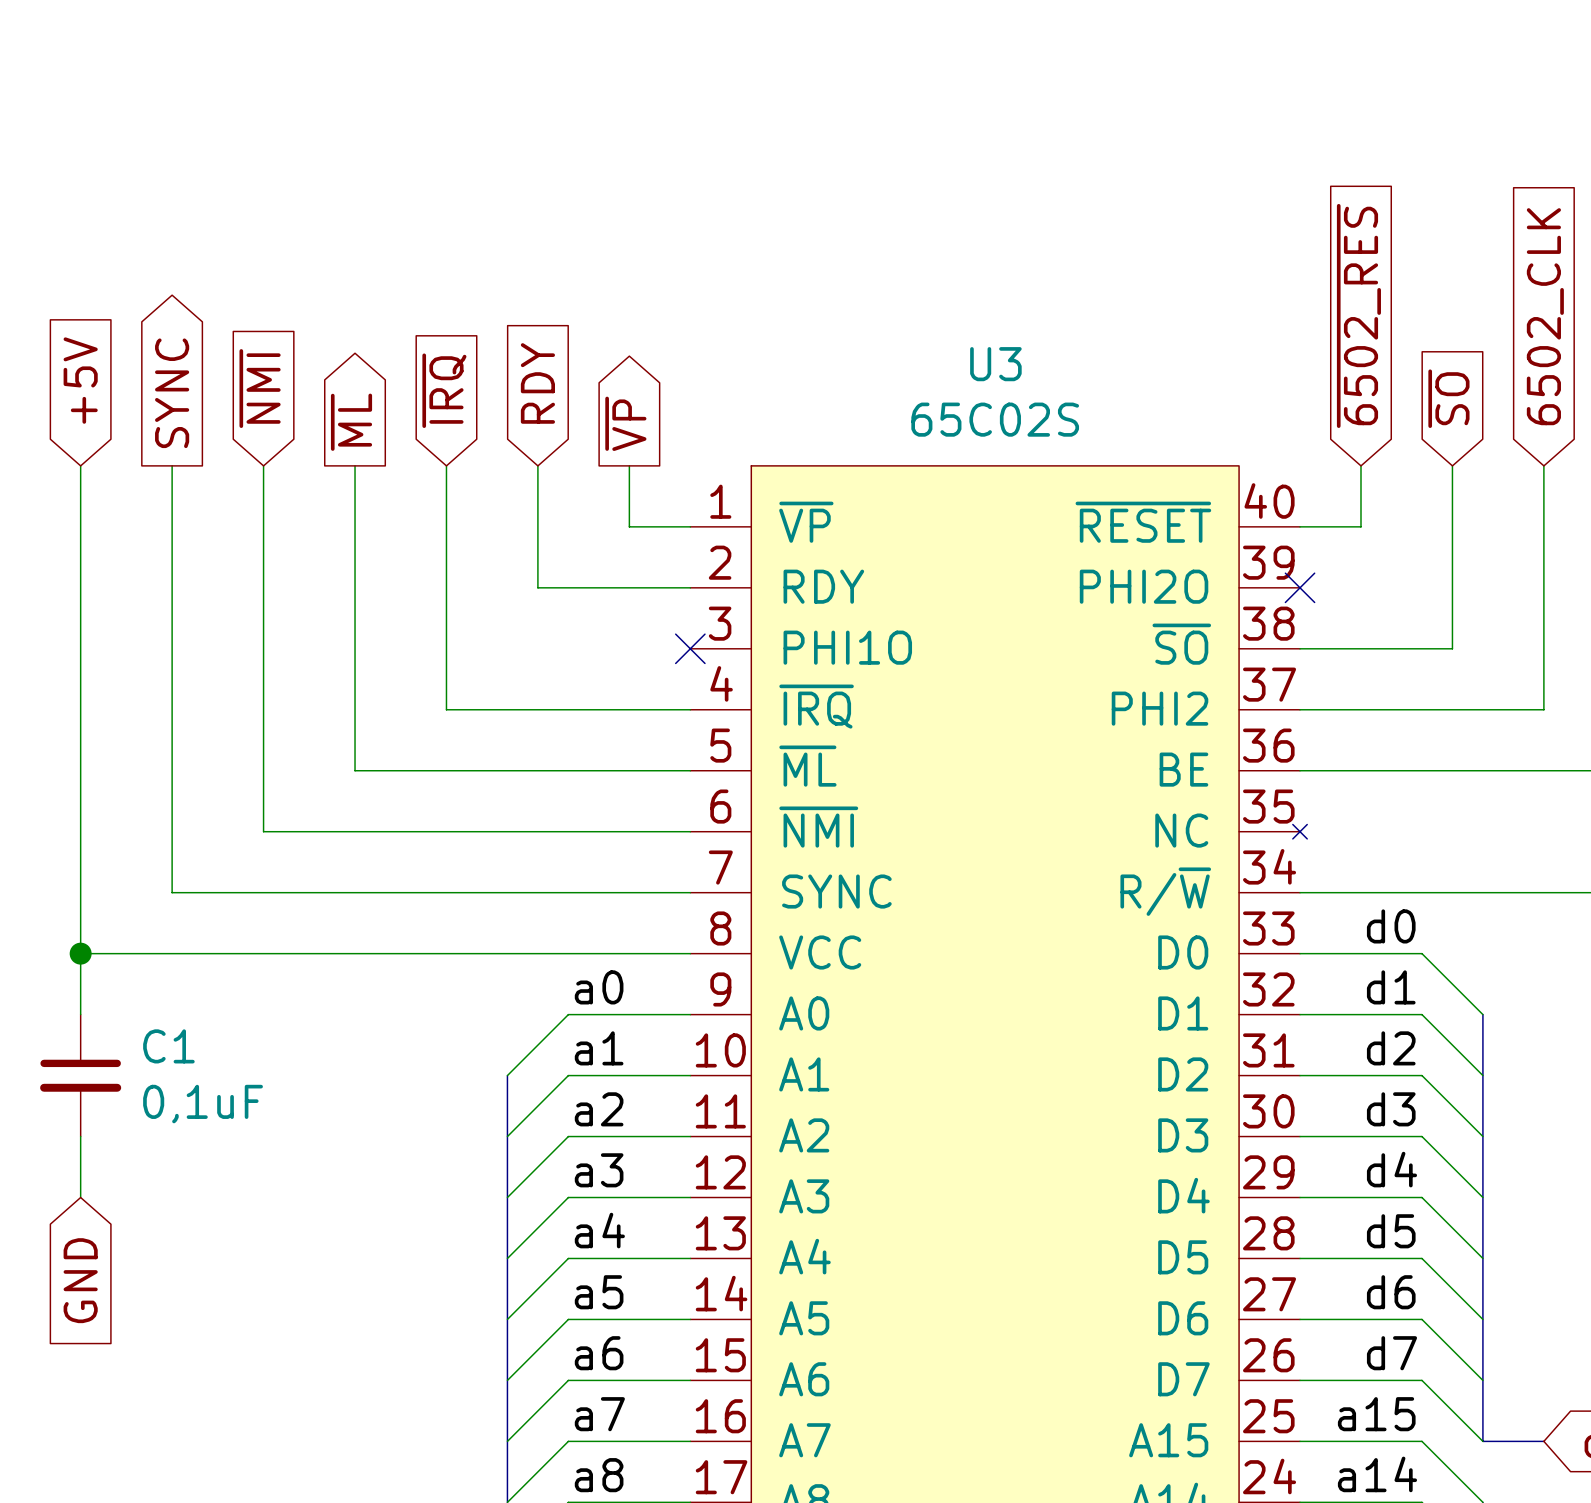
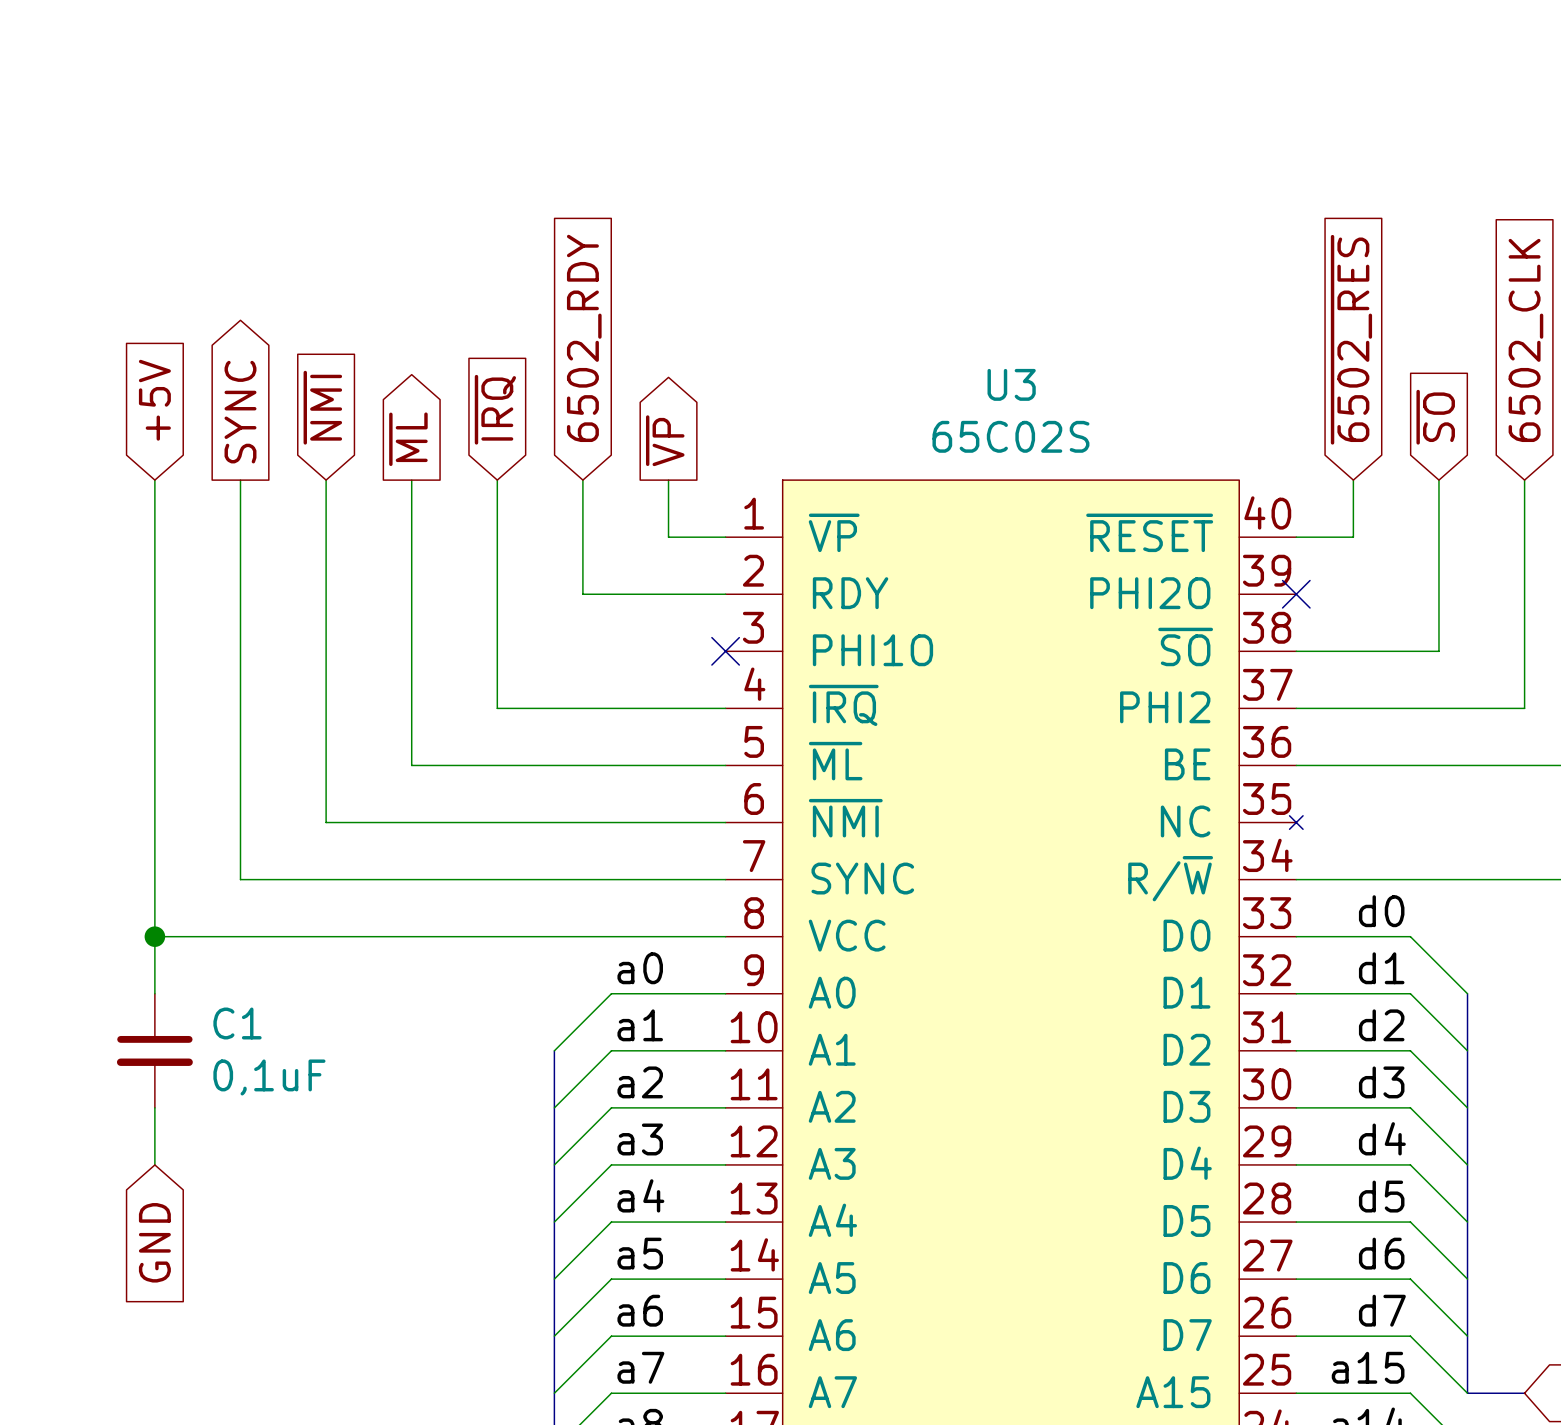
global label: RDY (537, 383) -> 6502_RDY (584, 338)

